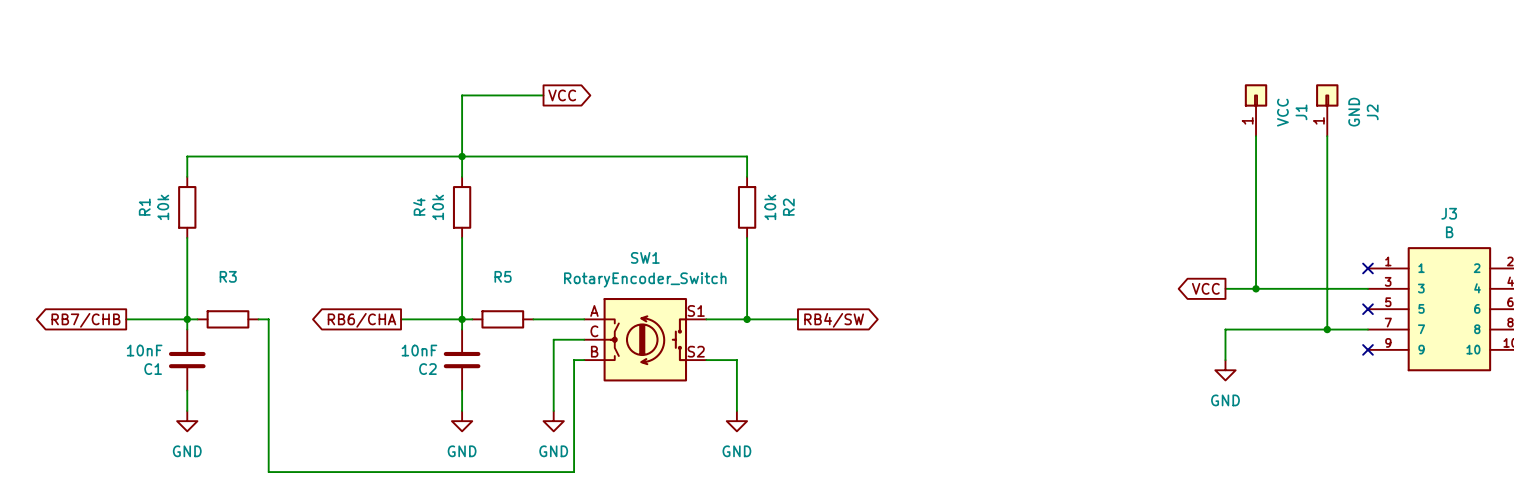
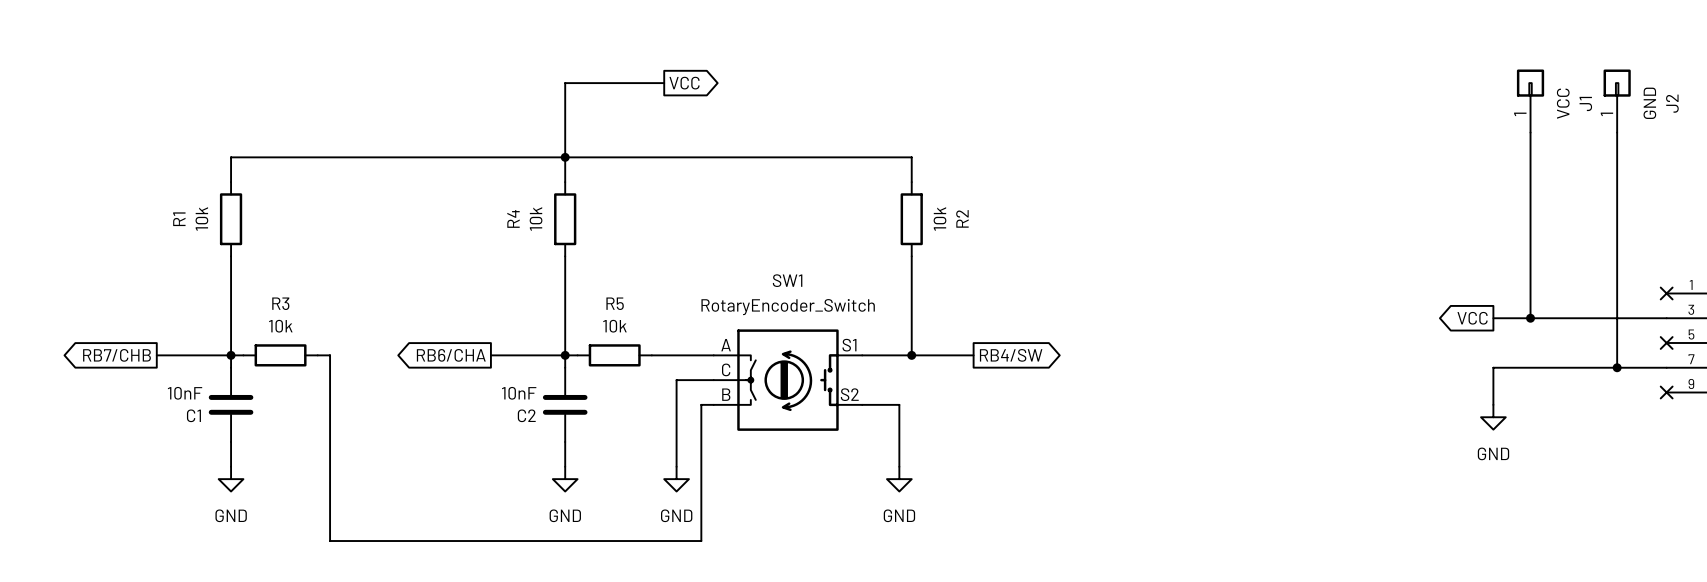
R3 value: none -> 10k (280, 326)
R5 value: none -> 10k (614, 326)

